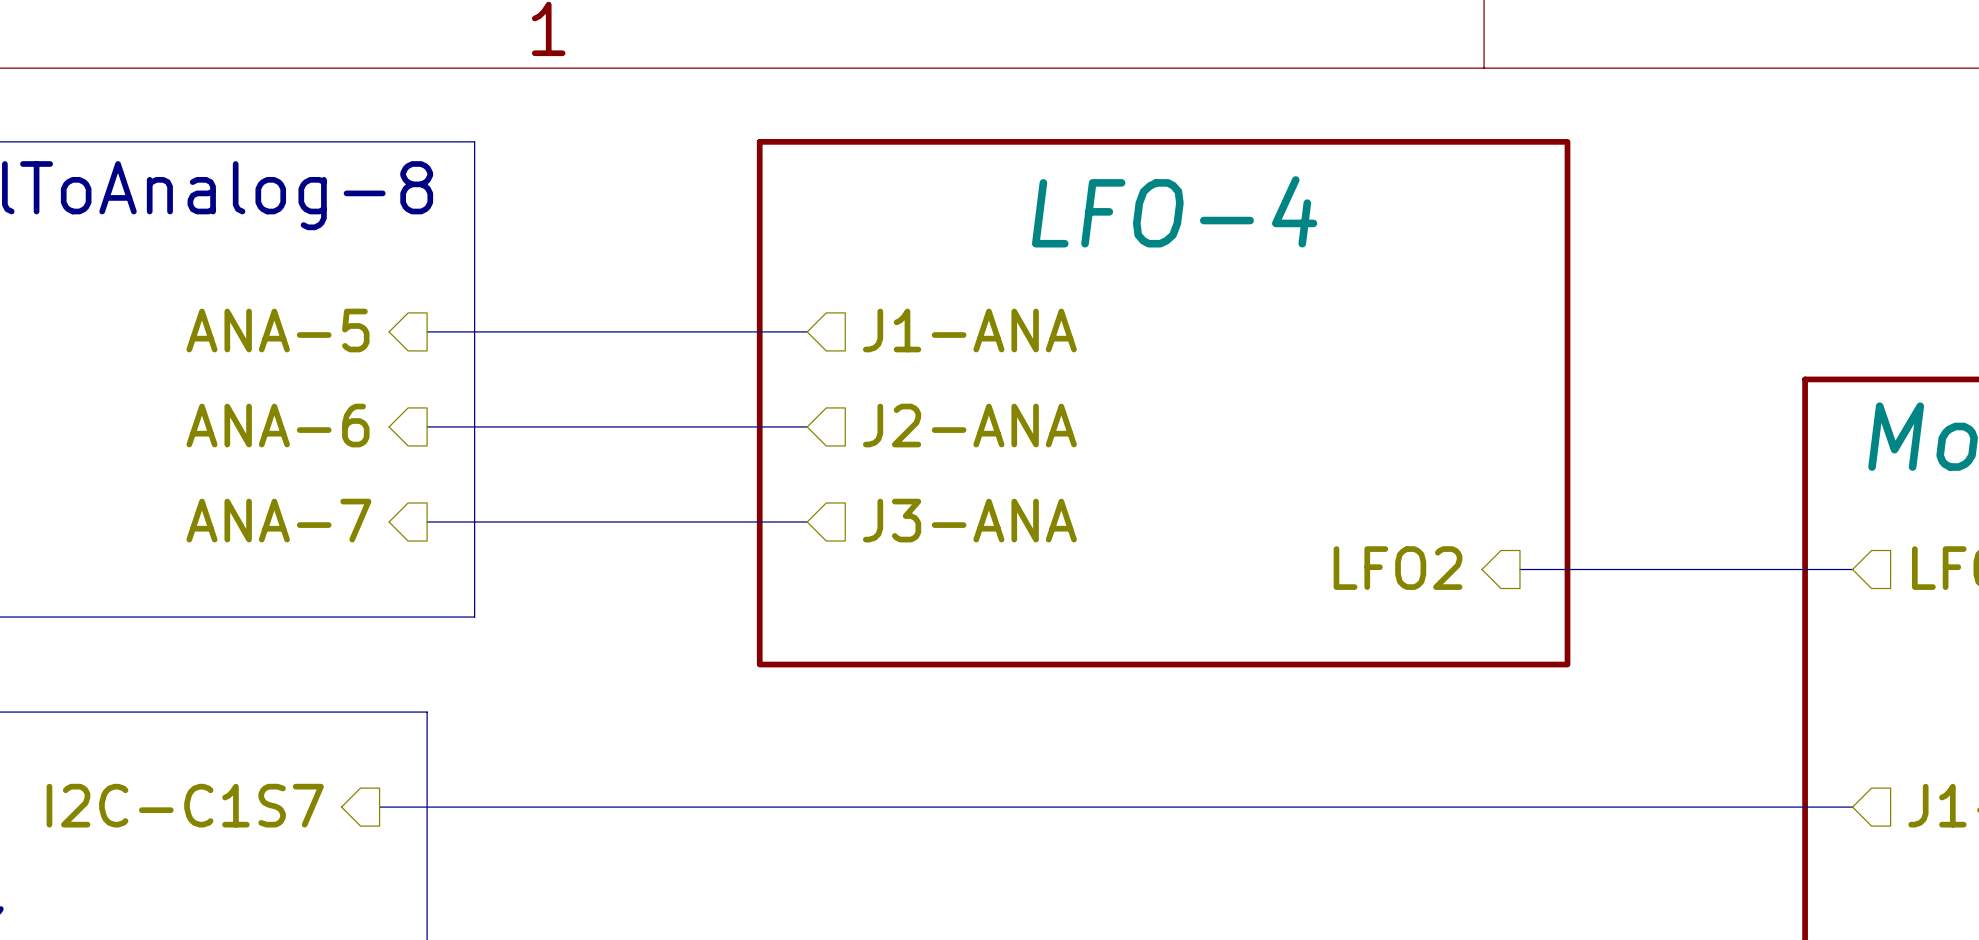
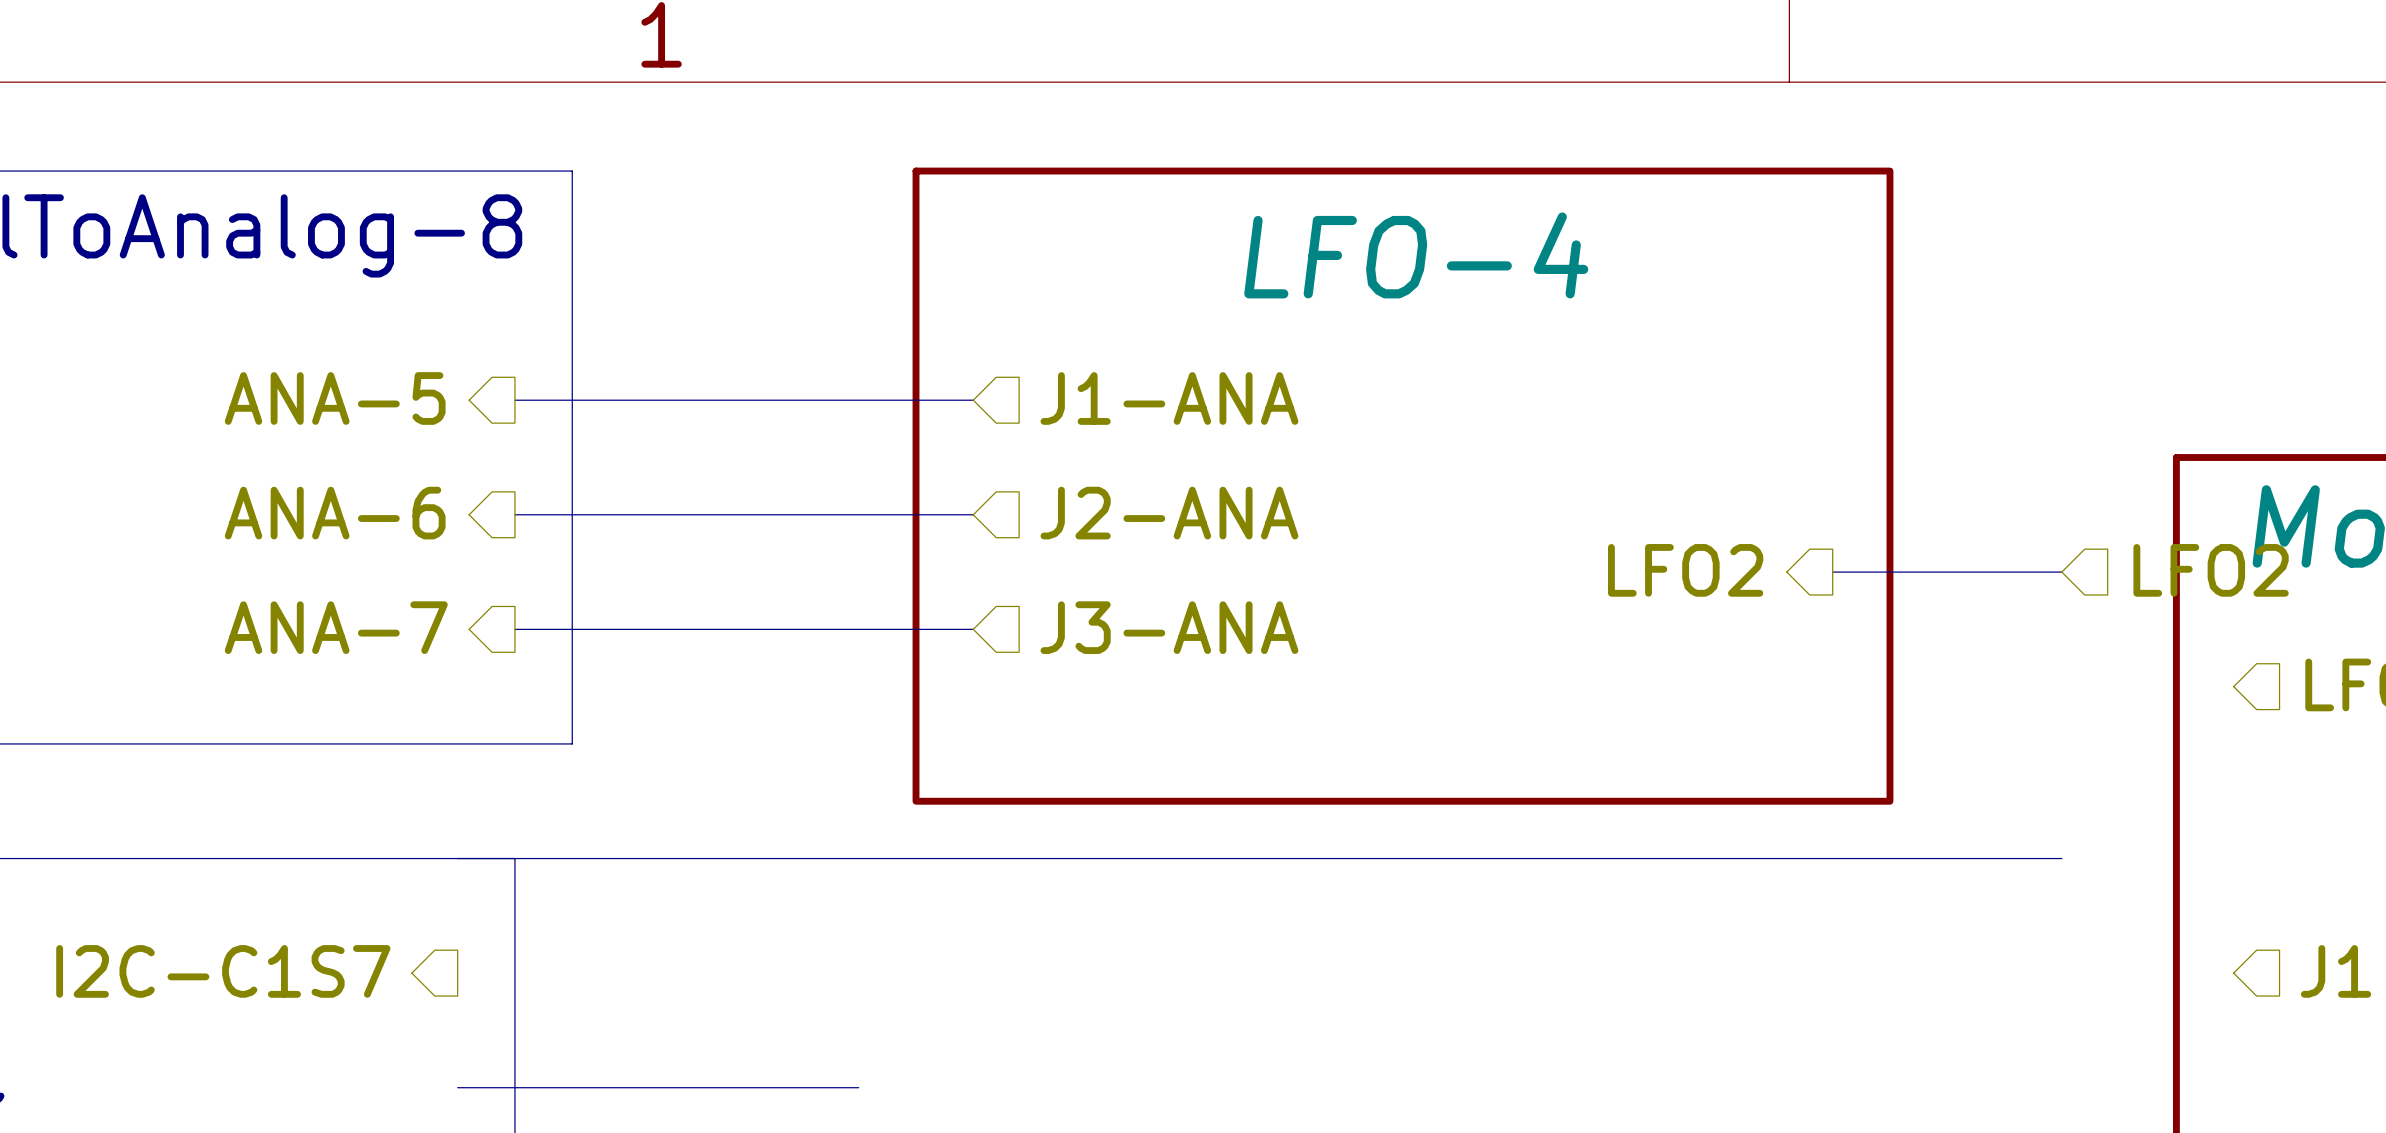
hierarchical label: none -> LFO2 (2211, 570)
bus: none -> (1832, 572) (2061, 572)
hierarchical label position: LFO2 (1398, 568) -> LFO2 (1685, 570)
bus: (1519, 569) (1852, 569) -> none
bus: none -> (457, 858) (2061, 858)
bus: (379, 807) (1852, 807) -> none
bus: none -> (457, 1087) (858, 1087)

